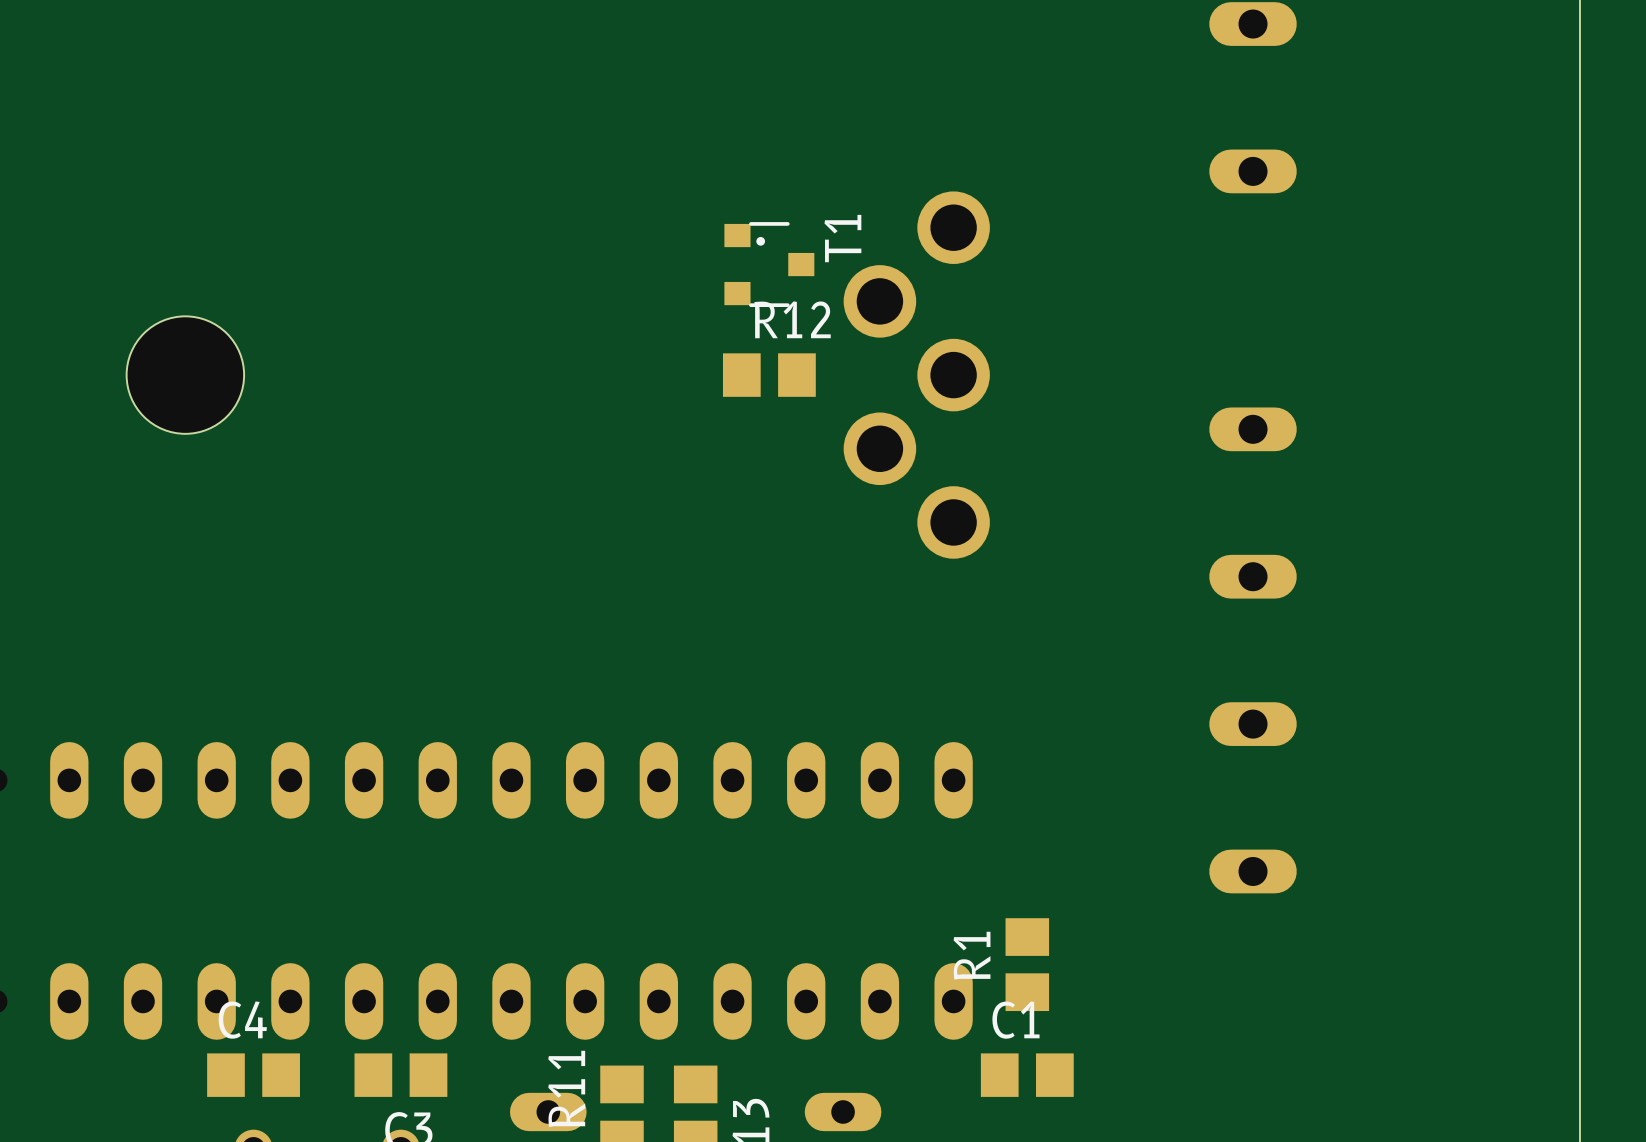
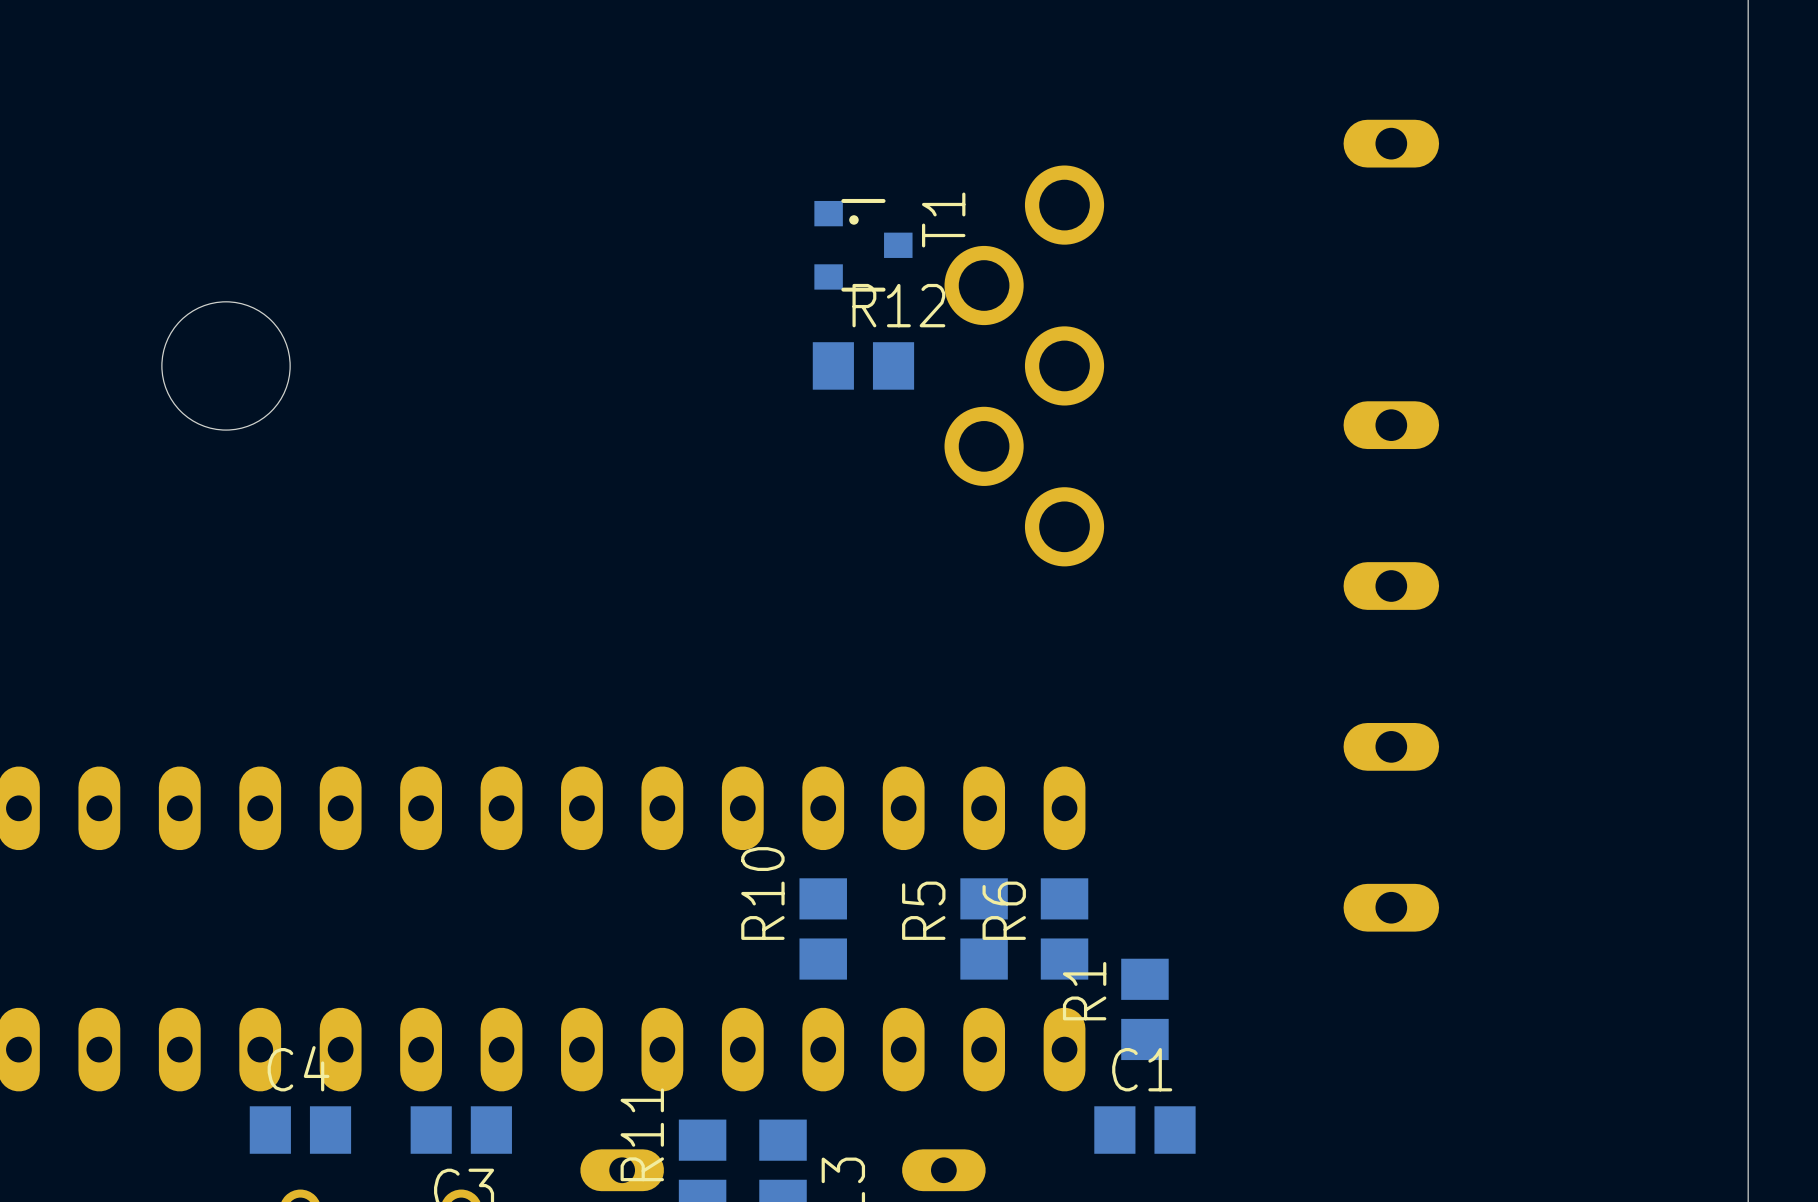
R10: none -> (823, 928)
R5: none -> (984, 928)
R6: none -> (1064, 928)

